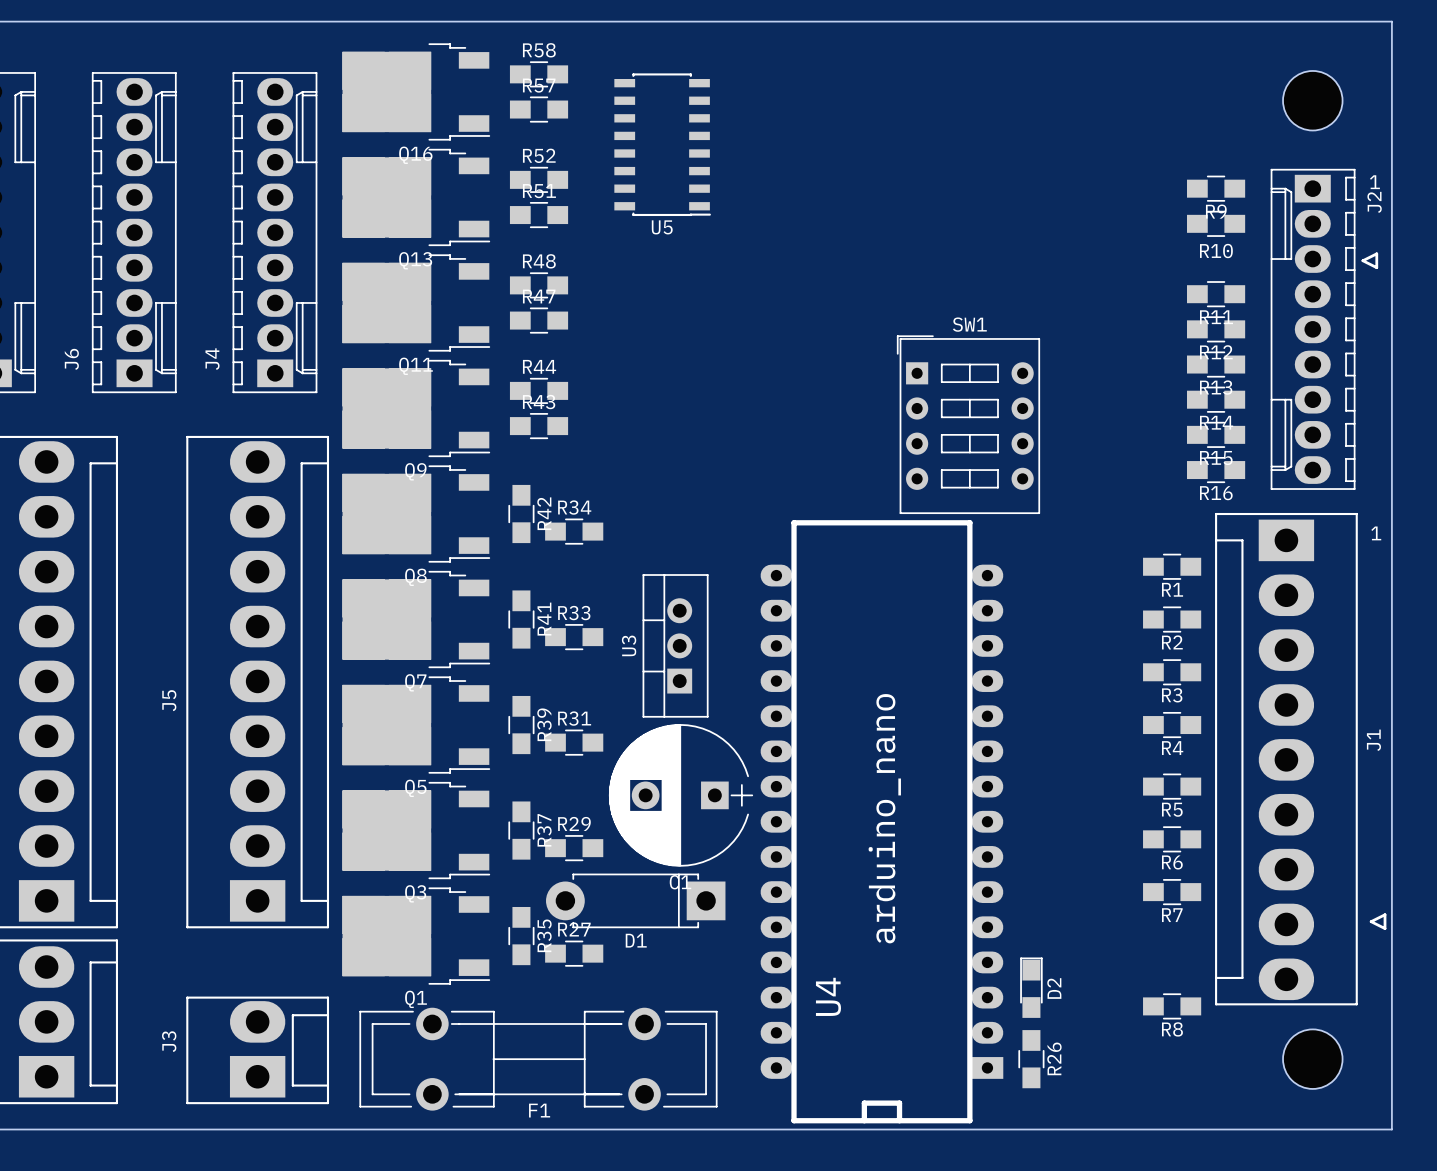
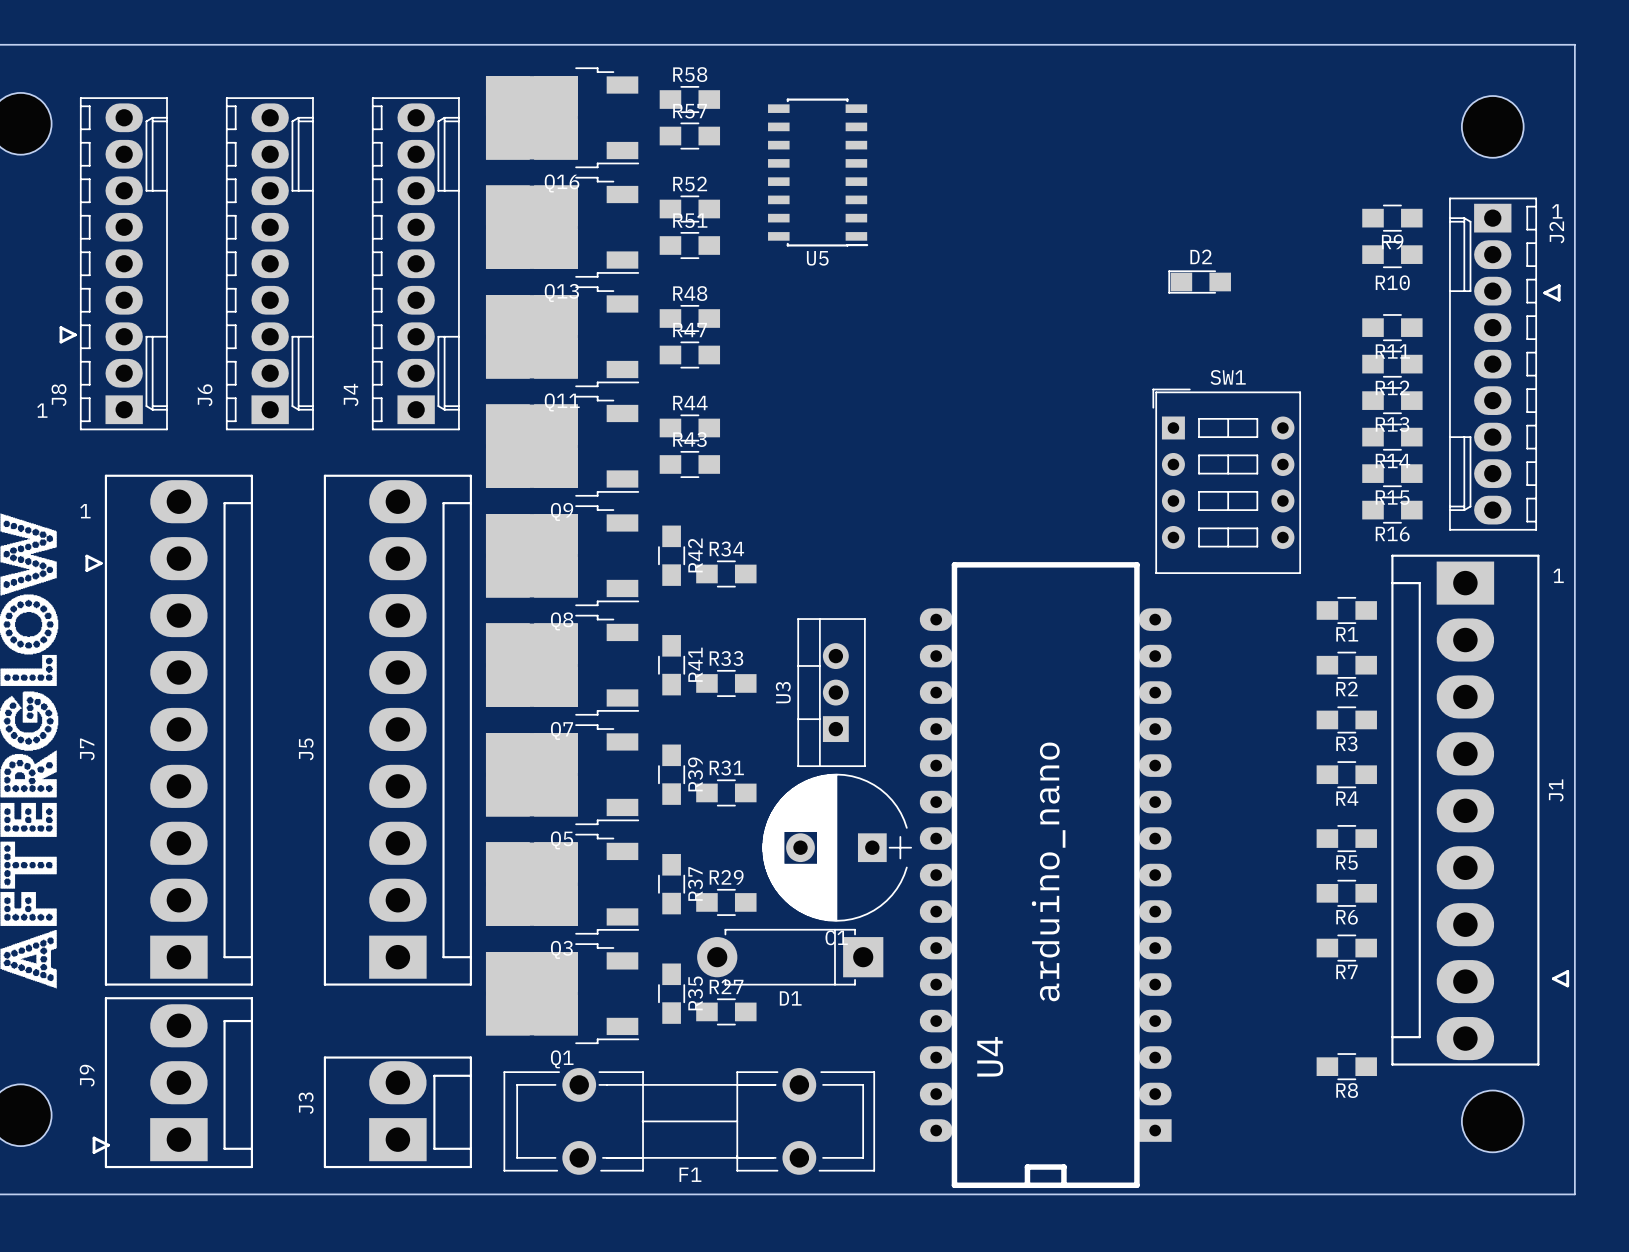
SW1 position: (968, 424) -> (1226, 481)
D2 rotation: 0° (1031, 987) -> 90° counterclockwise (1199, 282)
D2 position: (1031, 987) -> (1199, 282)
R26: (1031, 1059) -> none

